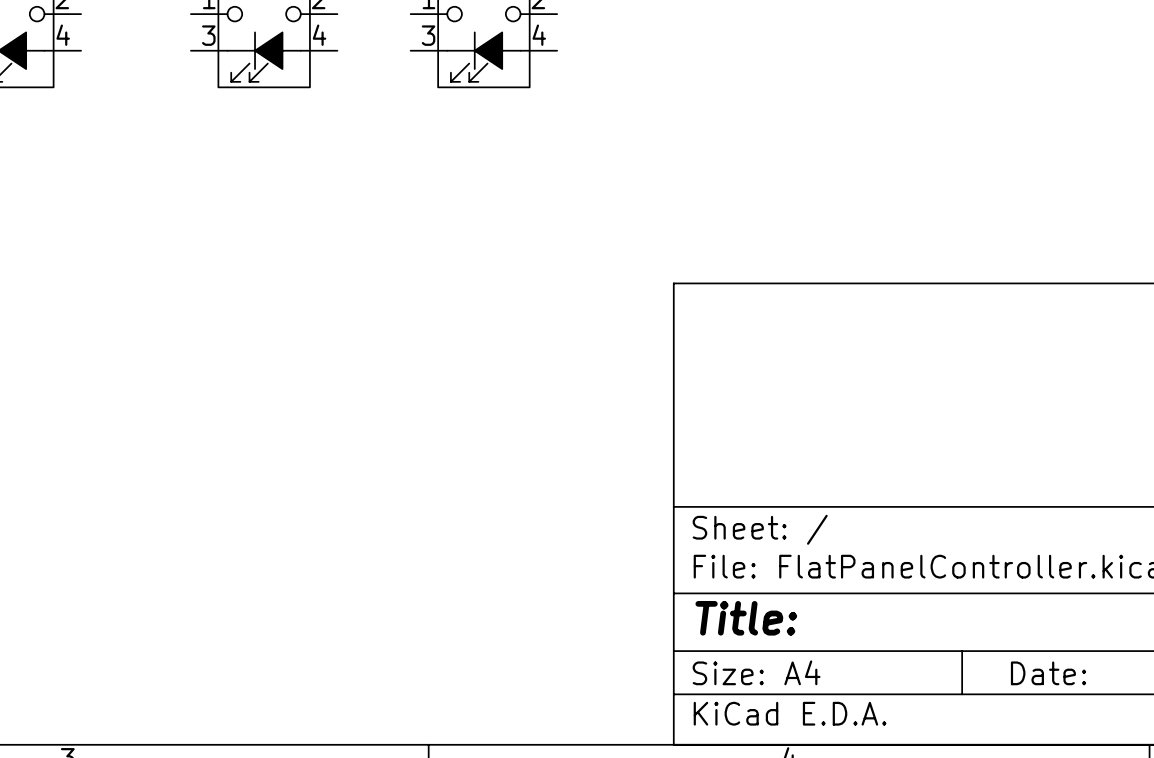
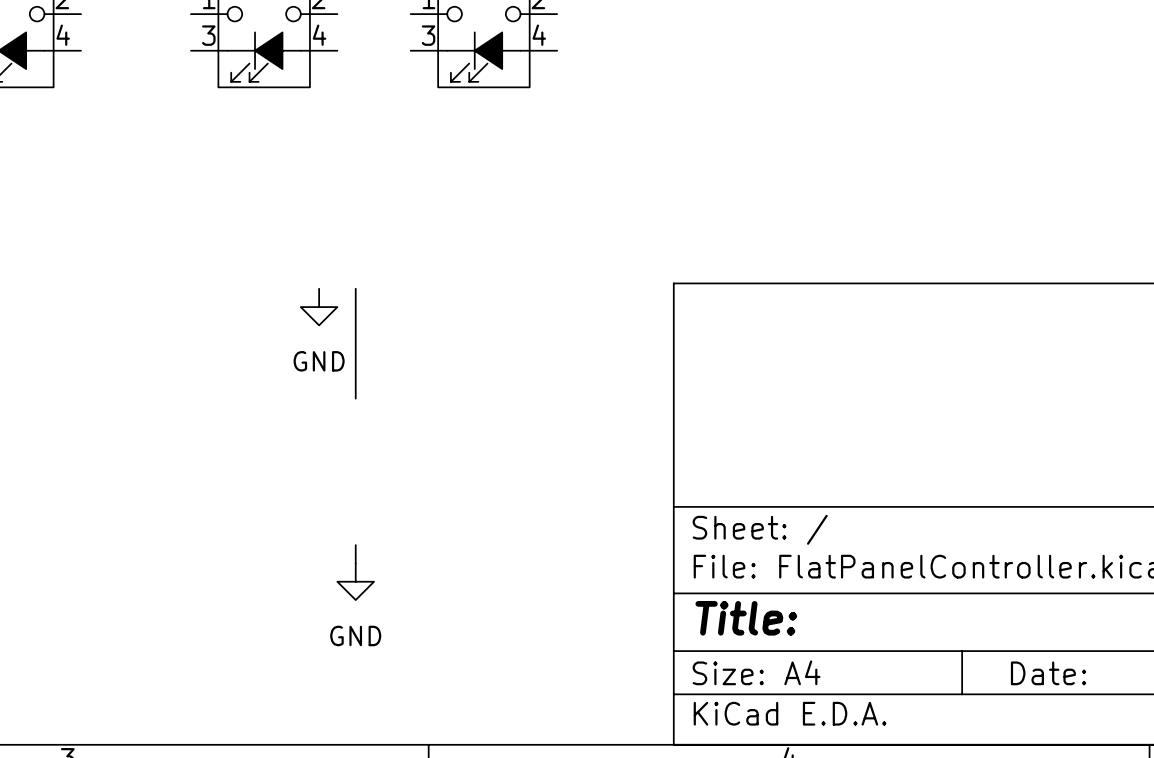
wire: none -> (355, 288) (355, 398)
power symbol: none -> GND (319, 307)
wire: none -> (355, 545) (355, 563)
power symbol: none -> GND (355, 581)

